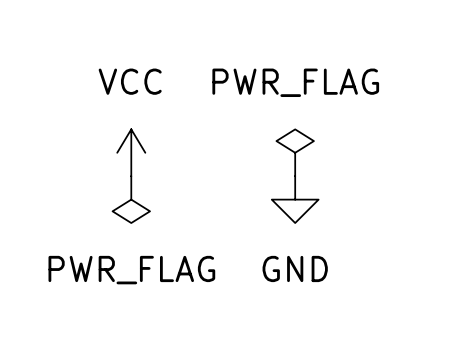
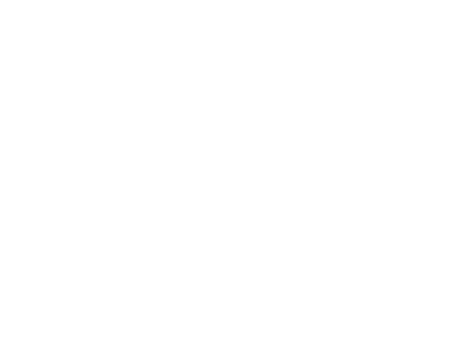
power symbol: VCC (131, 152) -> none
power symbol: PWR_FLAG (295, 152) -> none
power symbol: PWR_FLAG (131, 199) -> none
power symbol: GND (295, 199) -> none

